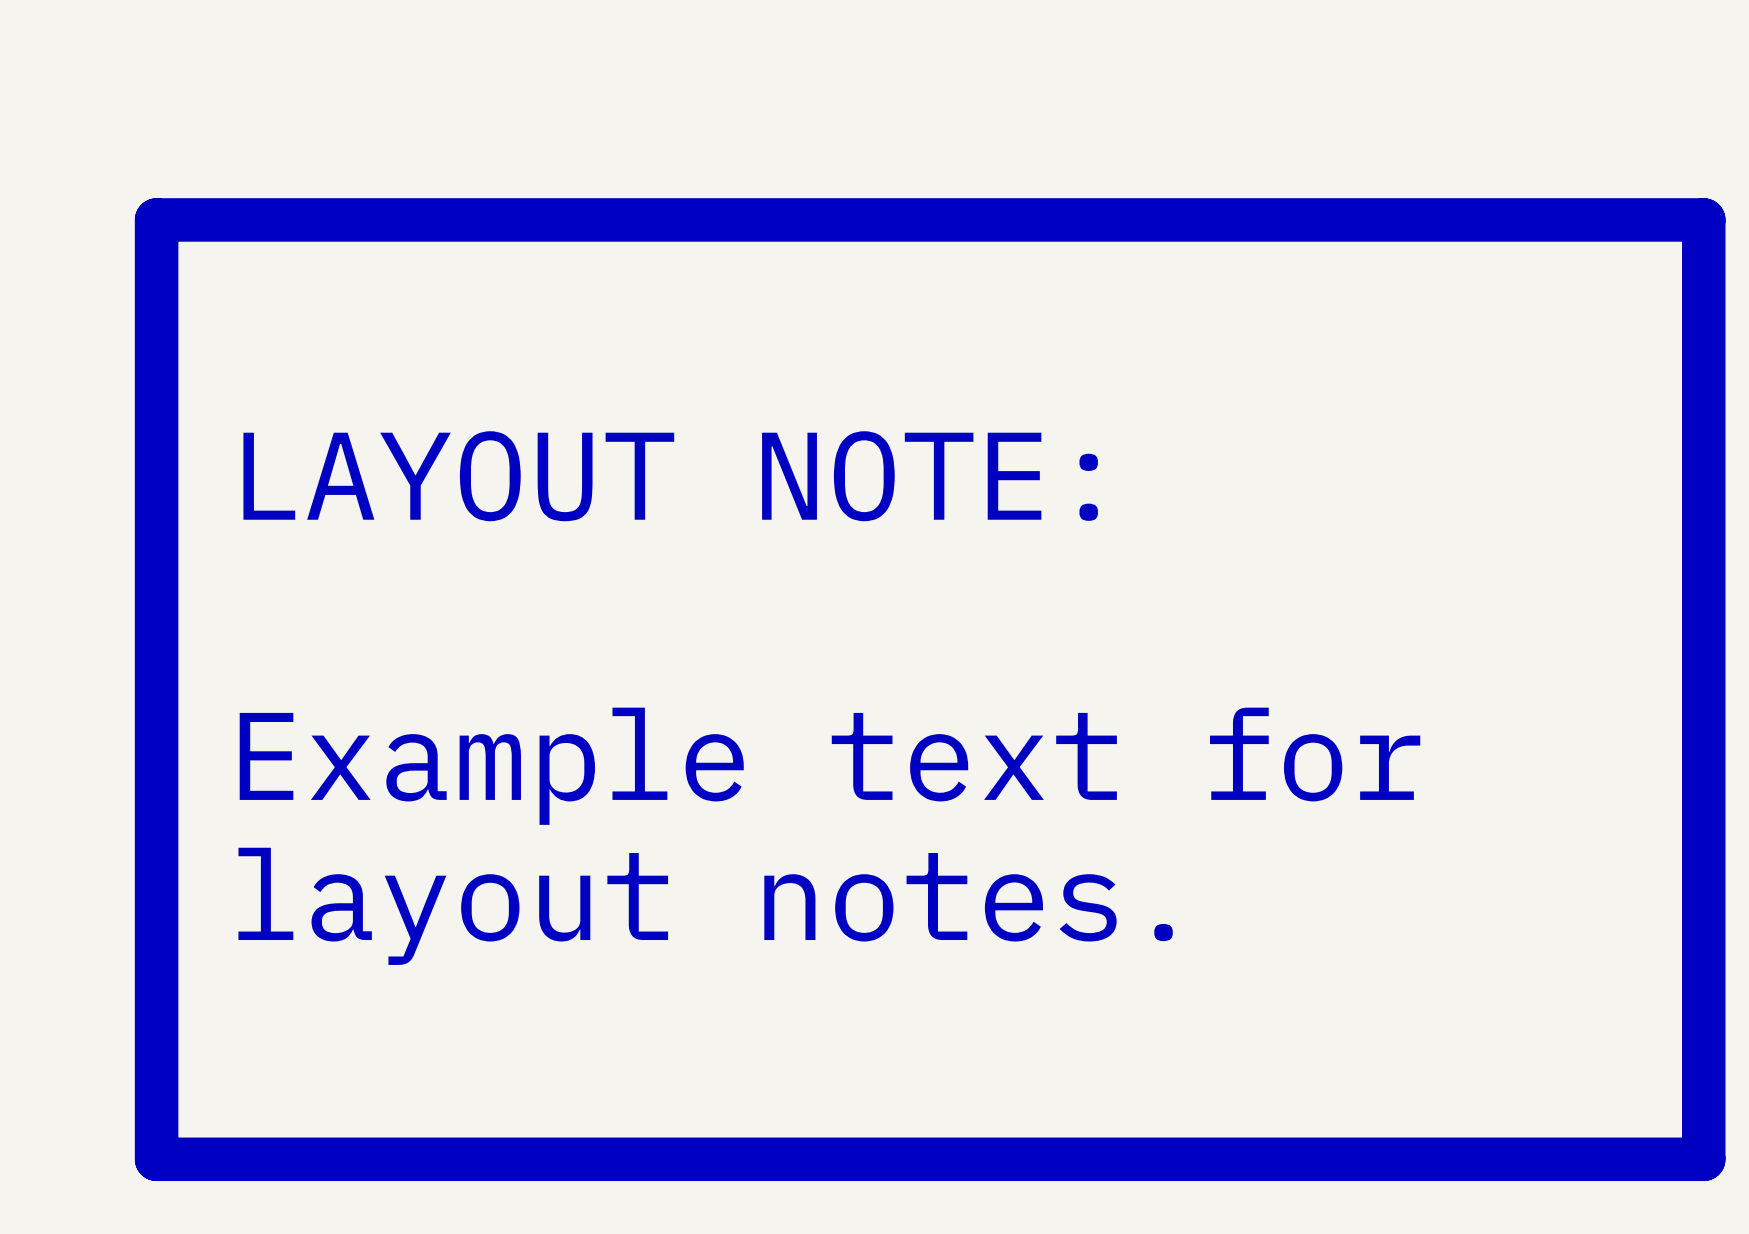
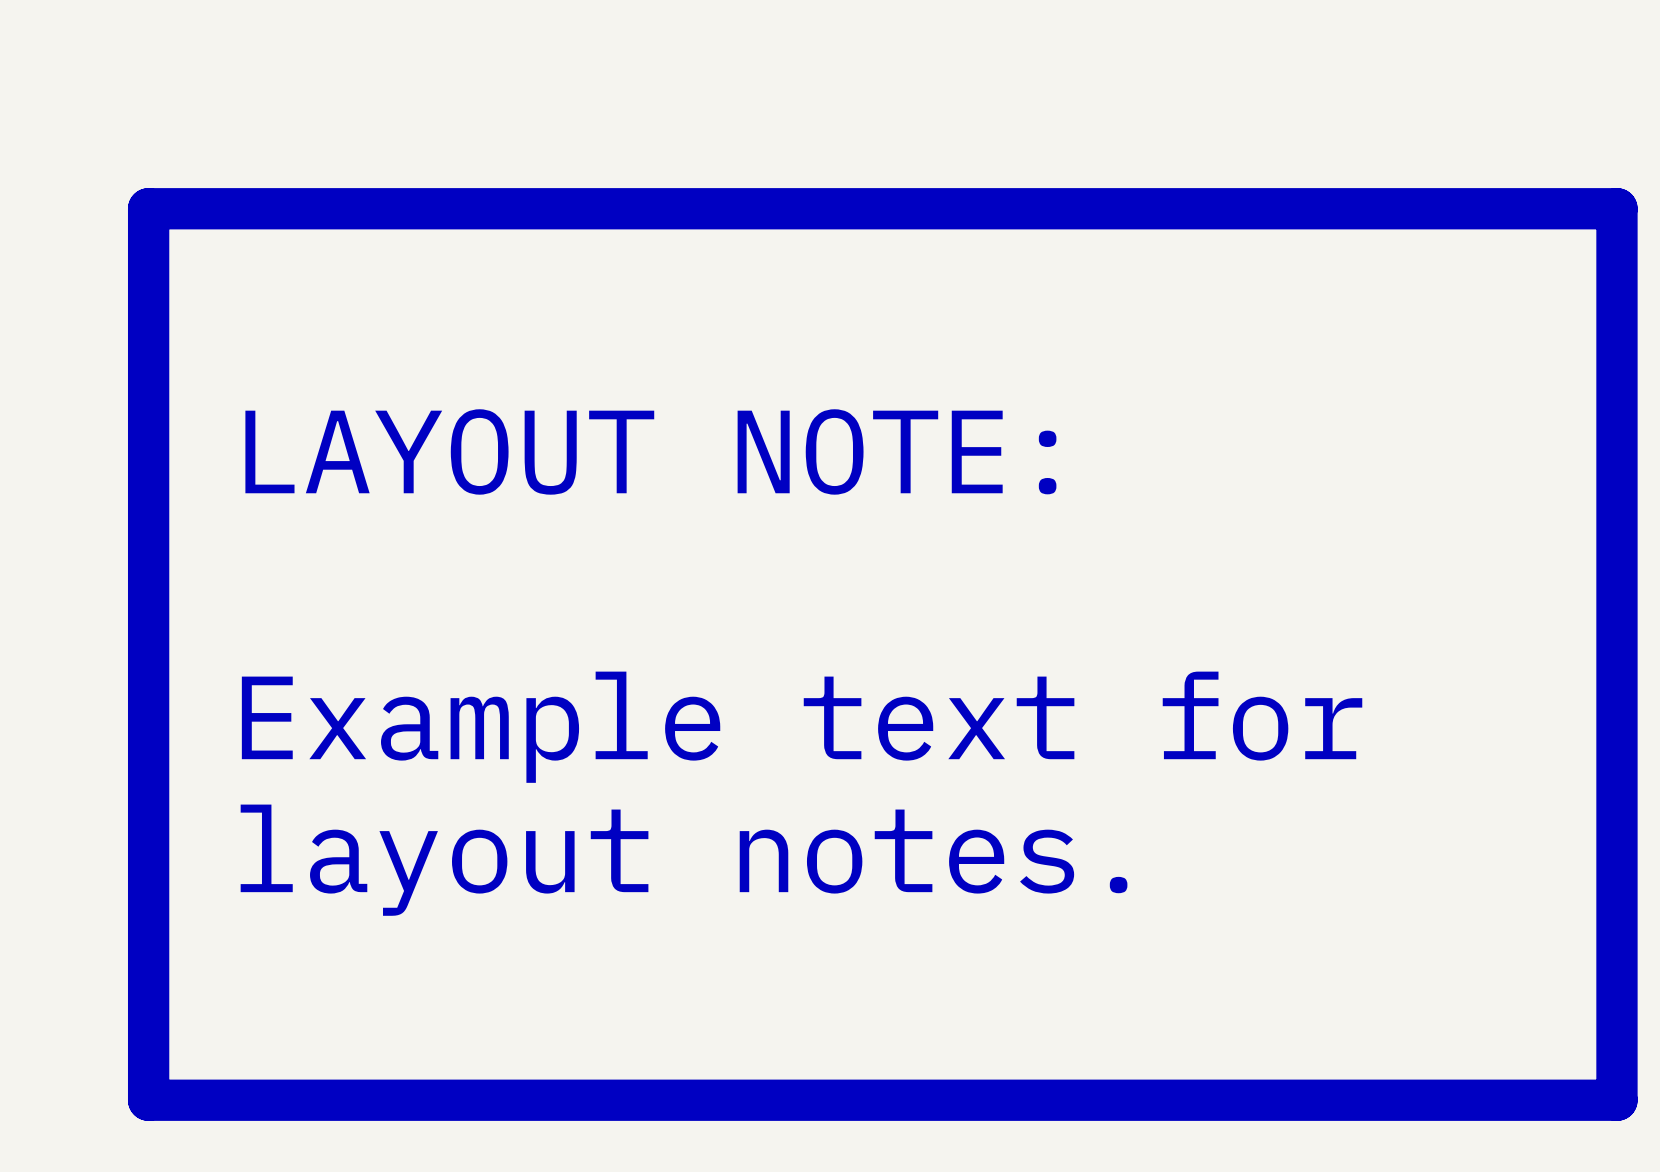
text position: LAYOUT NOTE: (670, 476) -> LAYOUT NOTE: (650, 451)
text position: Example text for (829, 766) -> Example text for (802, 727)
text position: layout notes. (705, 906) -> layout notes. (684, 860)

